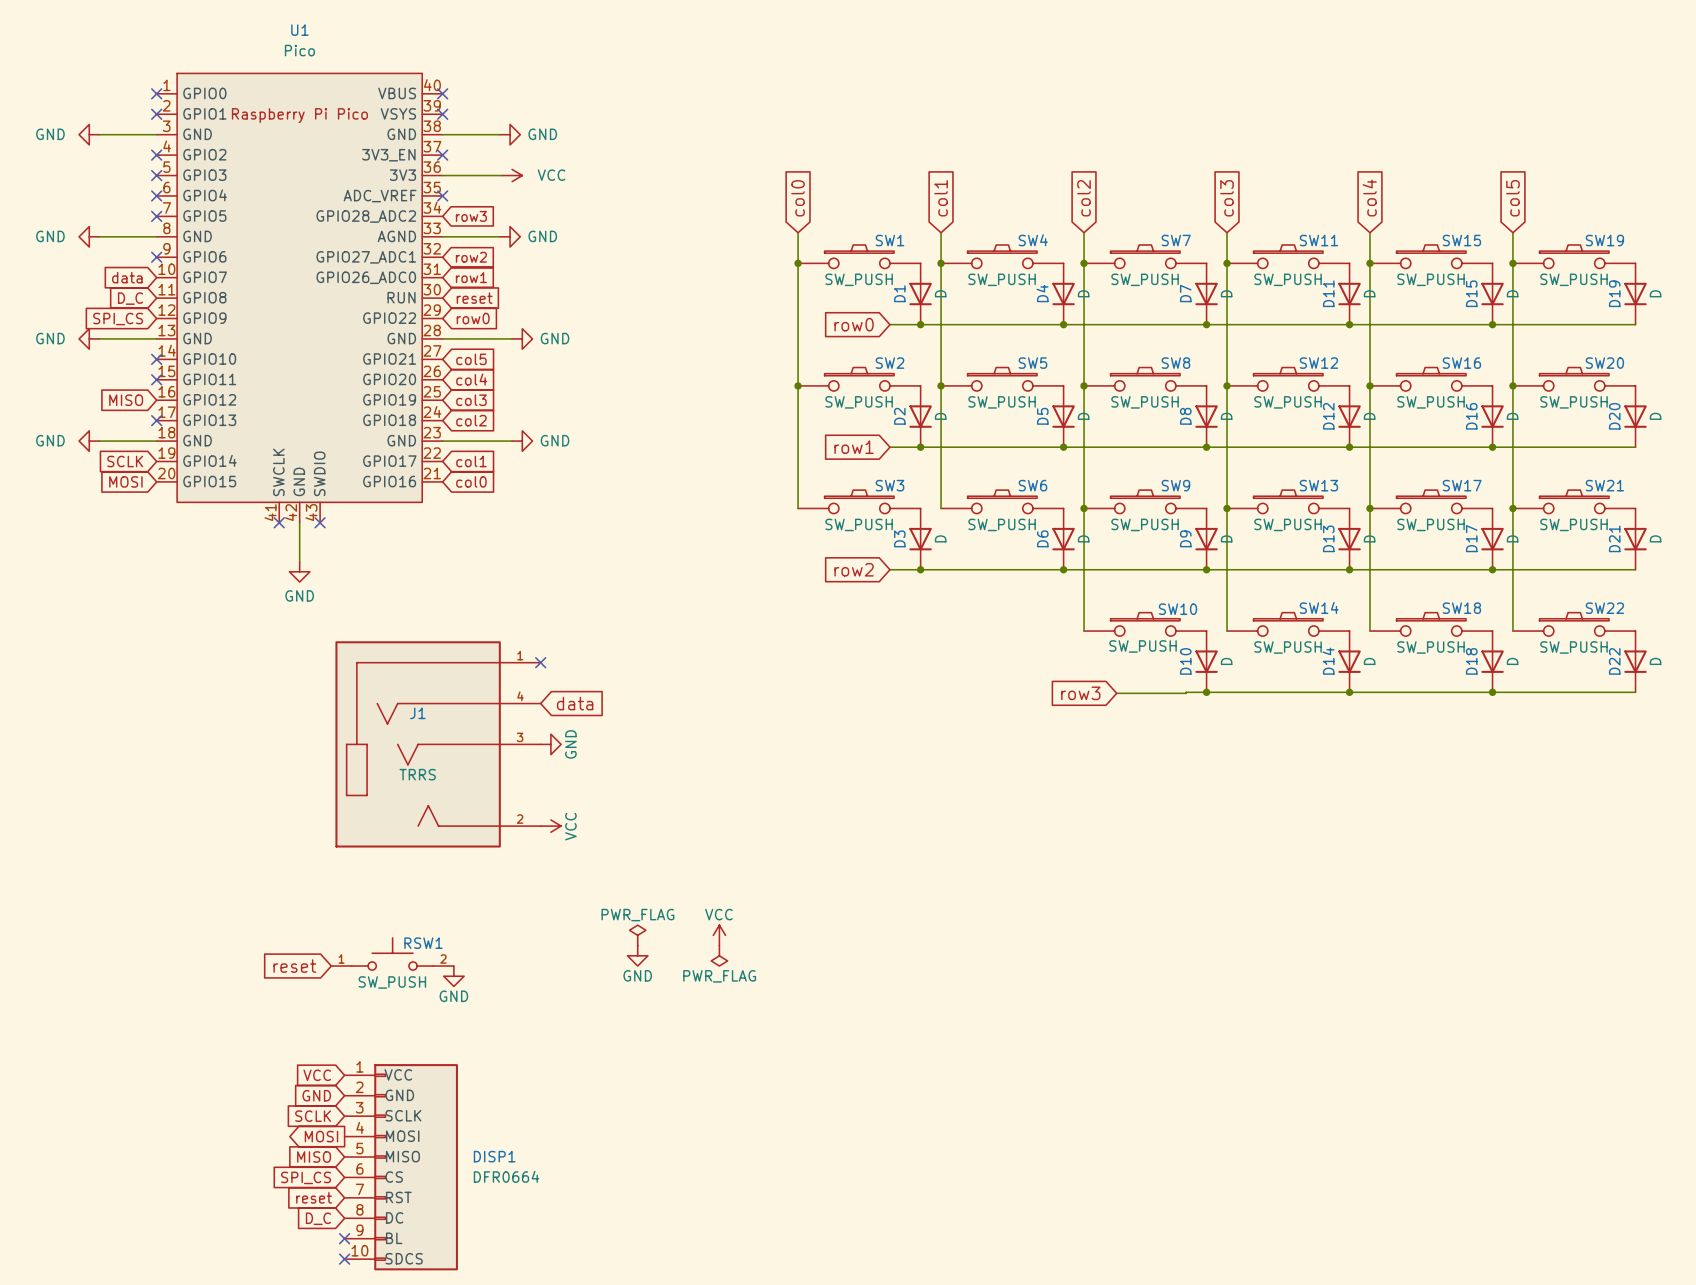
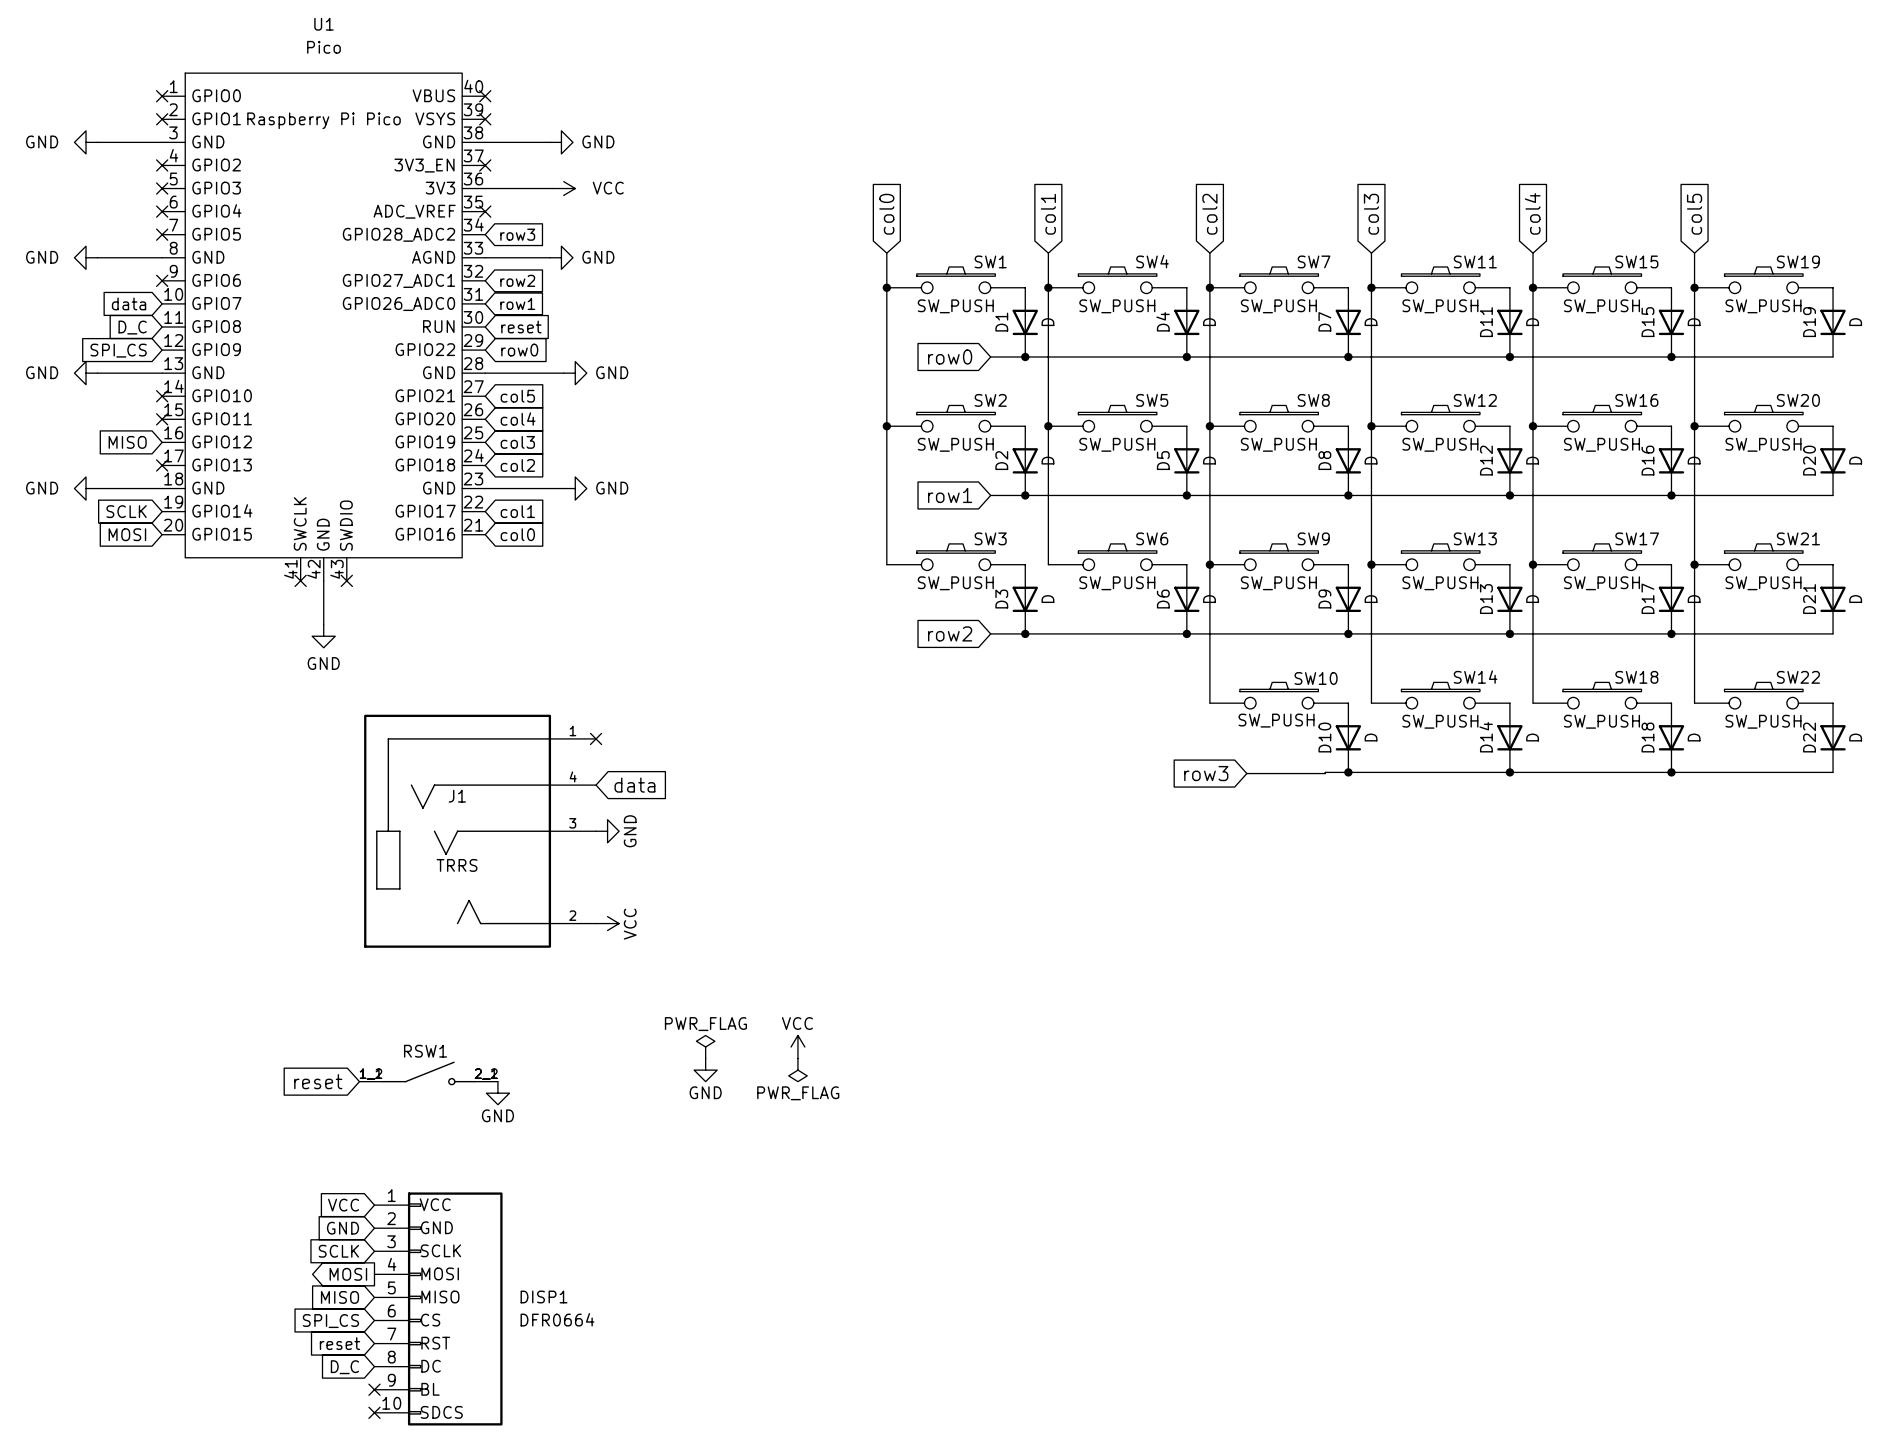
RSW1 symbol: [331, 937, 454, 971] -> [359, 1061, 498, 1086]
RSW1 name position: RSW1 (423, 943) -> RSW1 (425, 1051)
RSW1 value: SW_PUSH (392, 982) -> none

